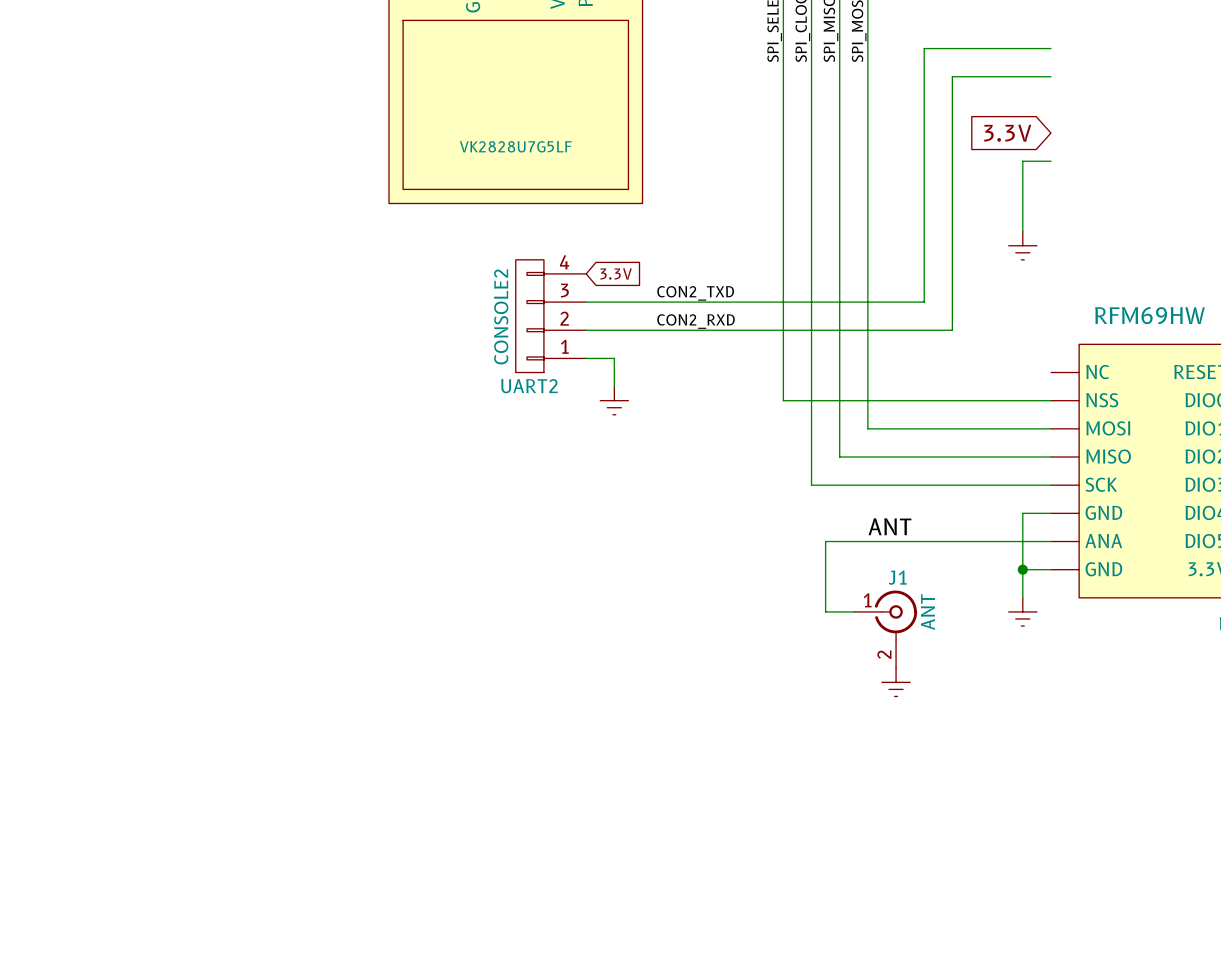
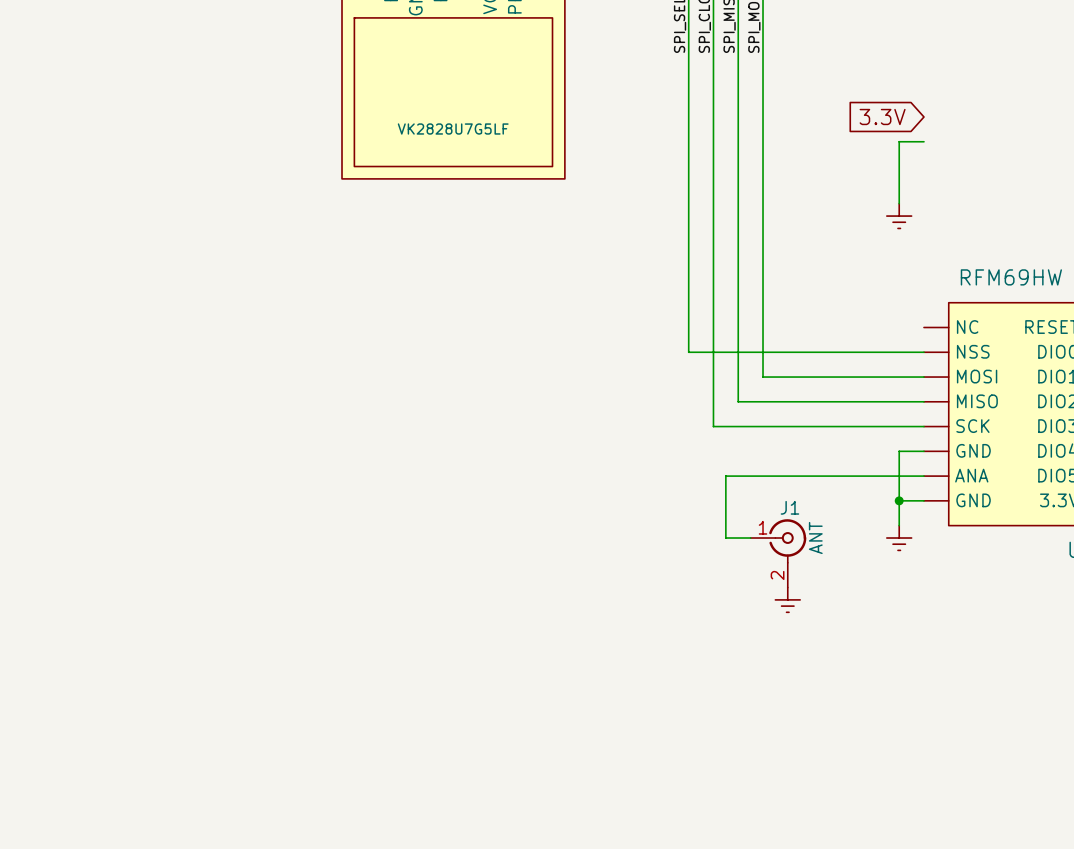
wire: (1050, 48) (924, 48) (924, 302) (586, 302) -> none
wire: (1050, 76) (952, 76) (952, 330) (586, 330) -> none
global label: 3.3V (616, 273) -> none
label: CON2_TXD (695, 293) -> none
UART2: CONSOLE2 (550, 316) -> none
label: CON2_RXD (696, 321) -> none
wire: (586, 358) (614, 358) (614, 386) -> none
power symbol: (614, 400) -> none
label: ANT (889, 526) -> none

